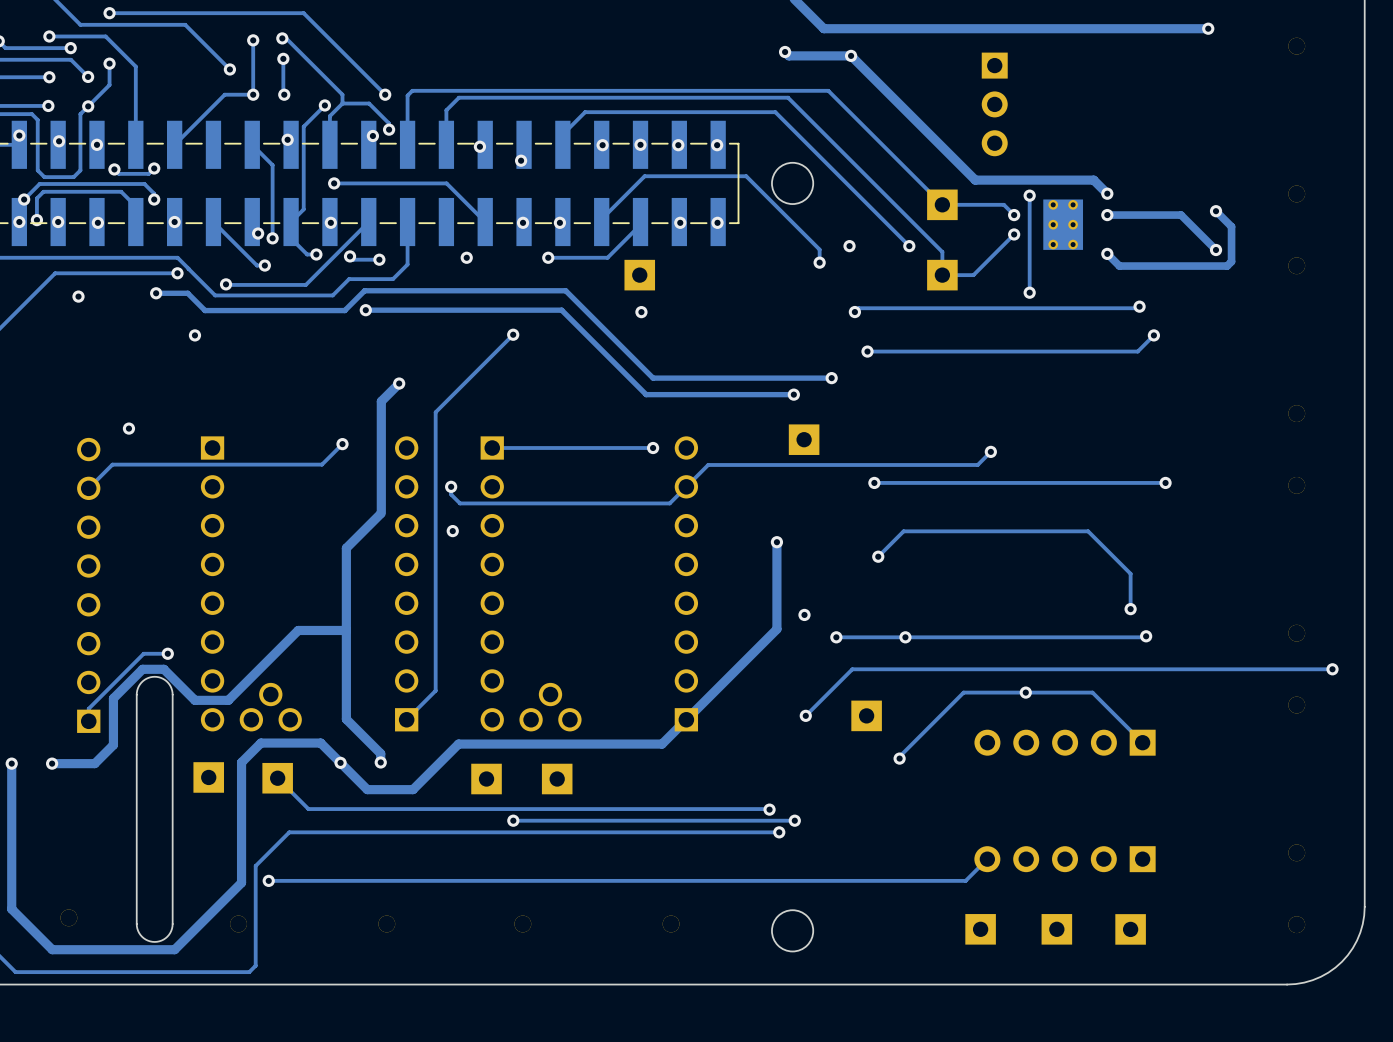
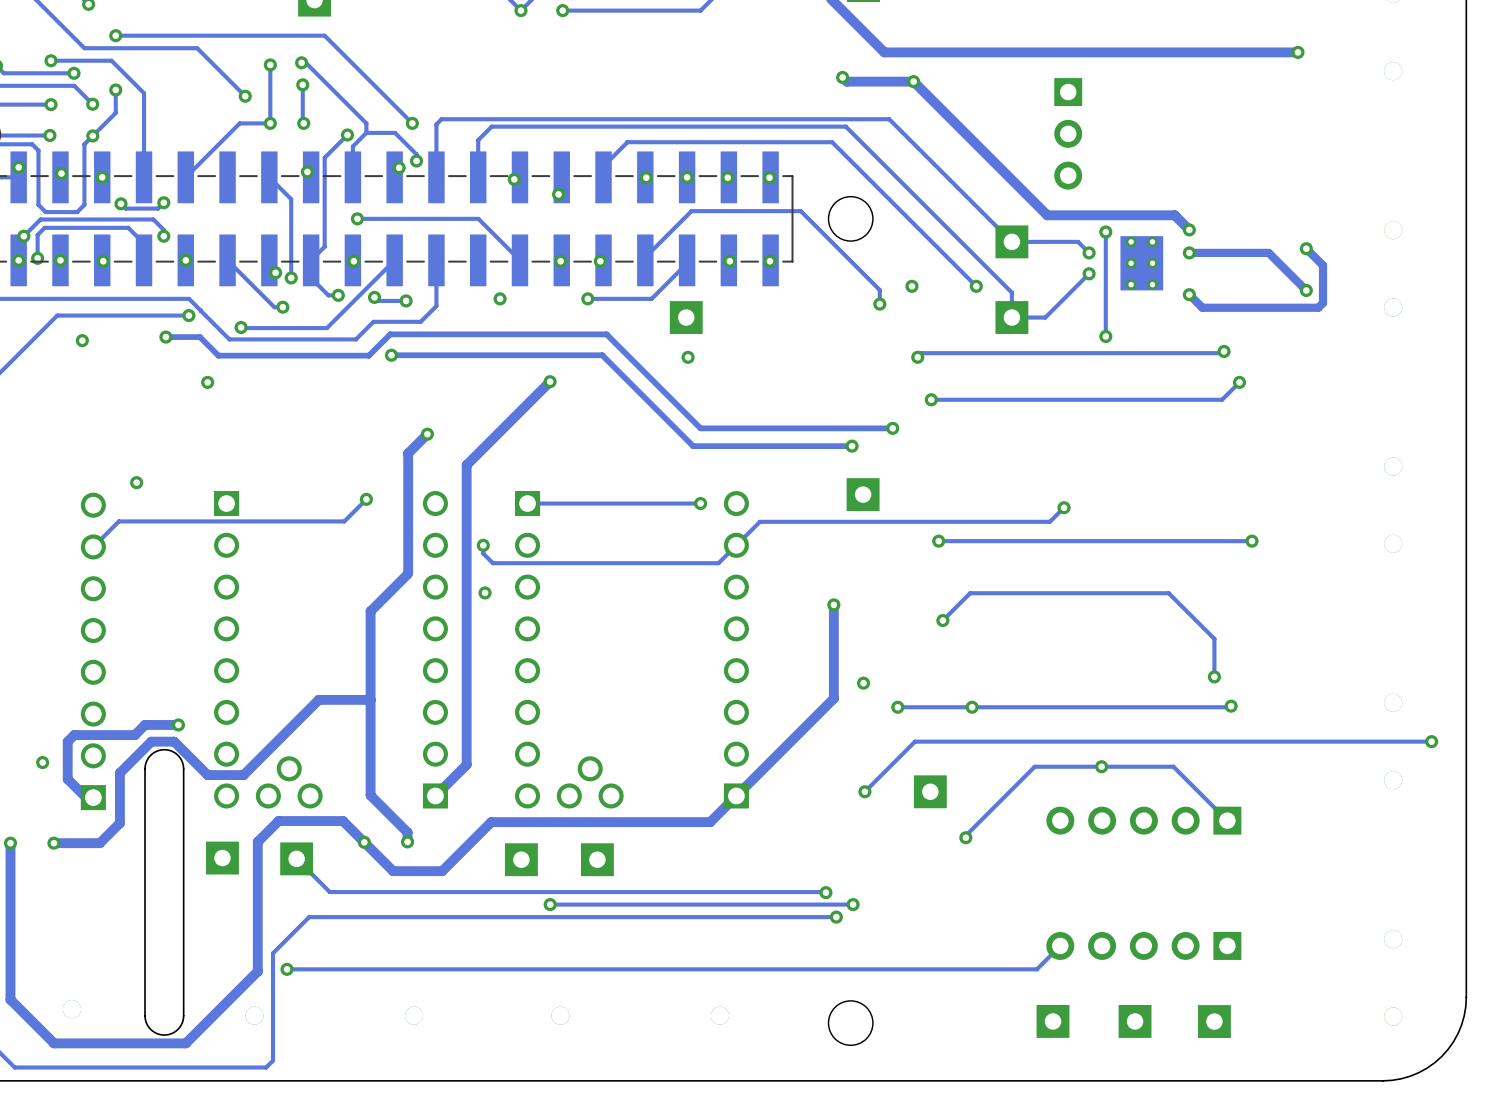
track width: thin (513, 334) (435, 412) (435, 690) (406, 719) -> thick (550, 381) (466, 465) (466, 764) (435, 795)
track: (143, 653) (88, 708) (88, 721) -> (152, 724) (145, 724) (134, 735) (74, 735) (67, 741) (67, 779) (86, 797) (93, 797)
track width: thin (167, 653) (143, 653) -> thick (178, 724) (152, 724)
via: none -> (42, 762)

